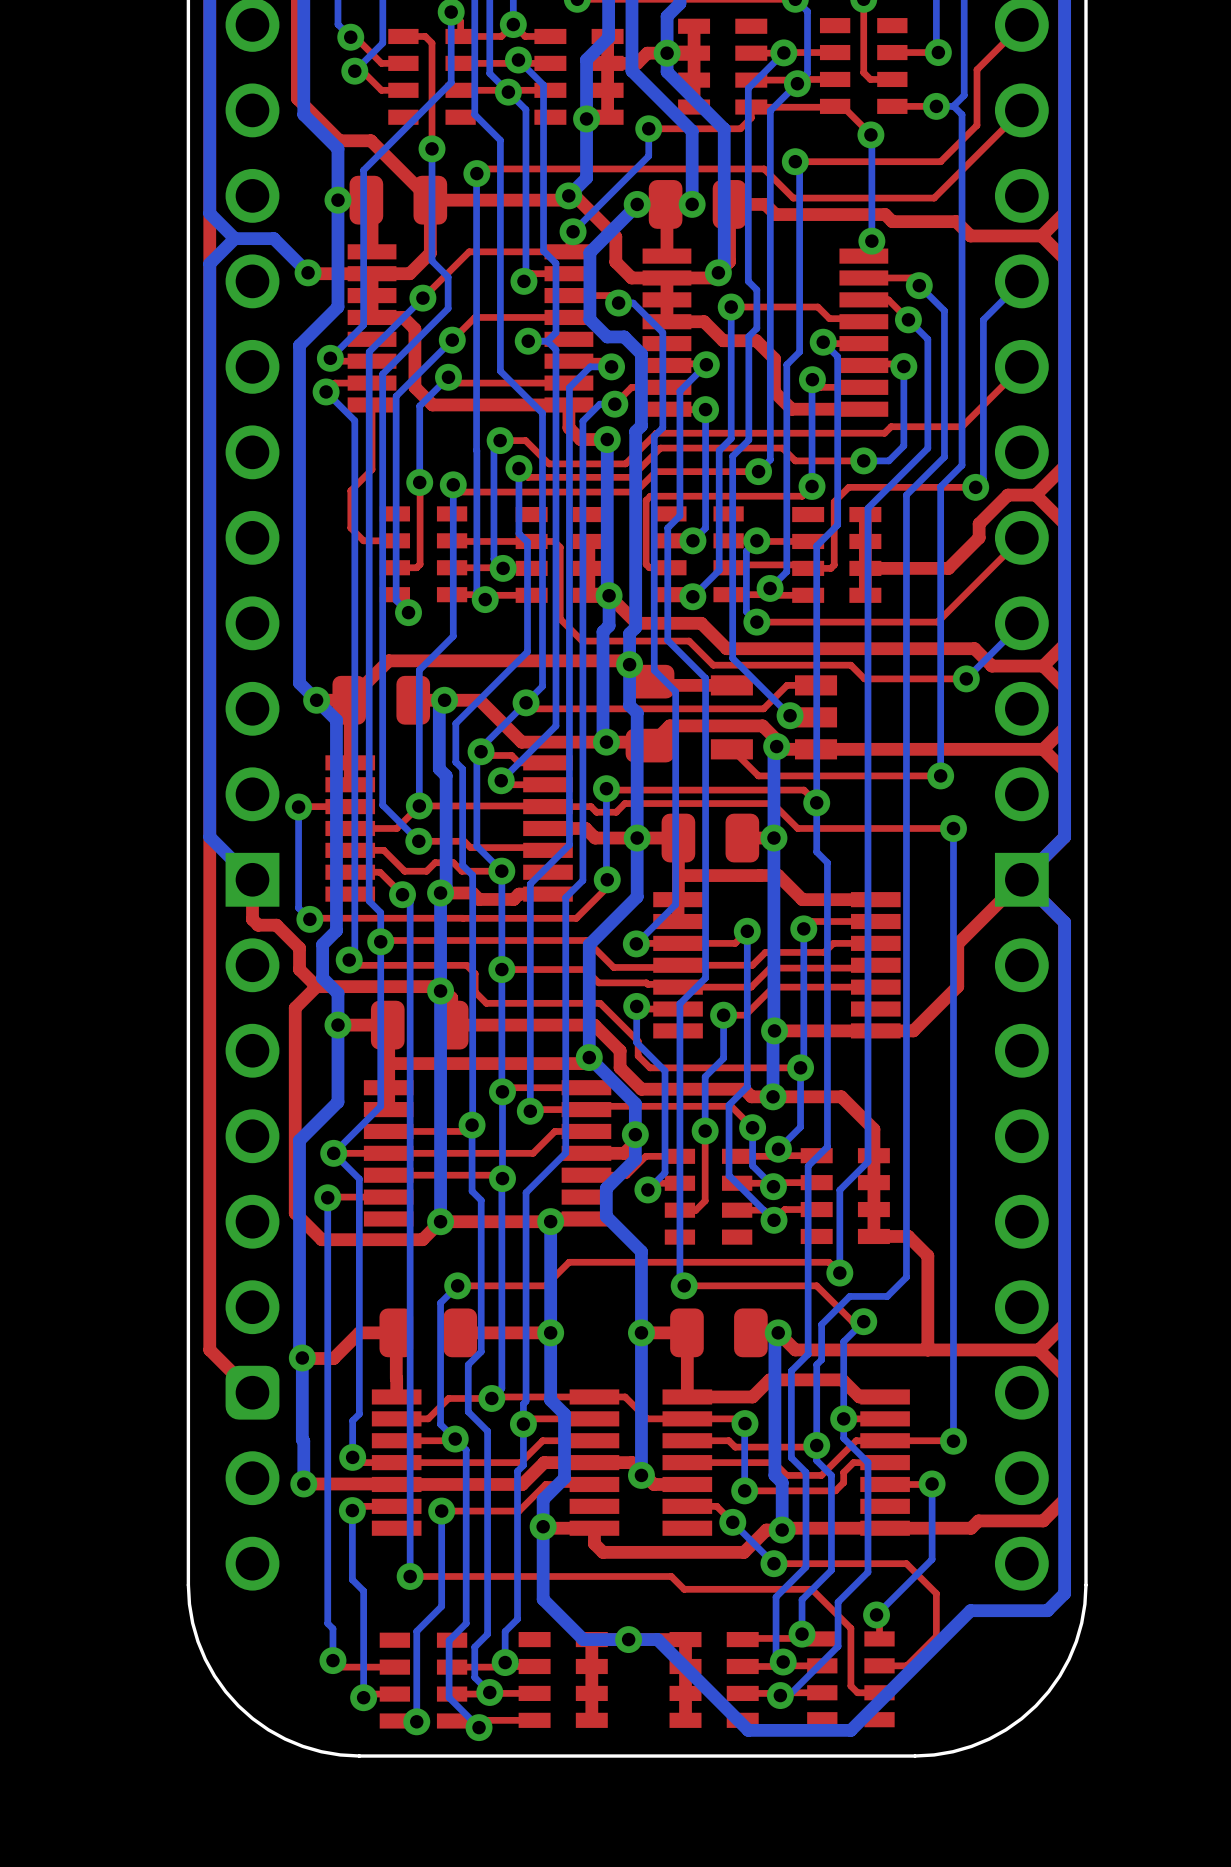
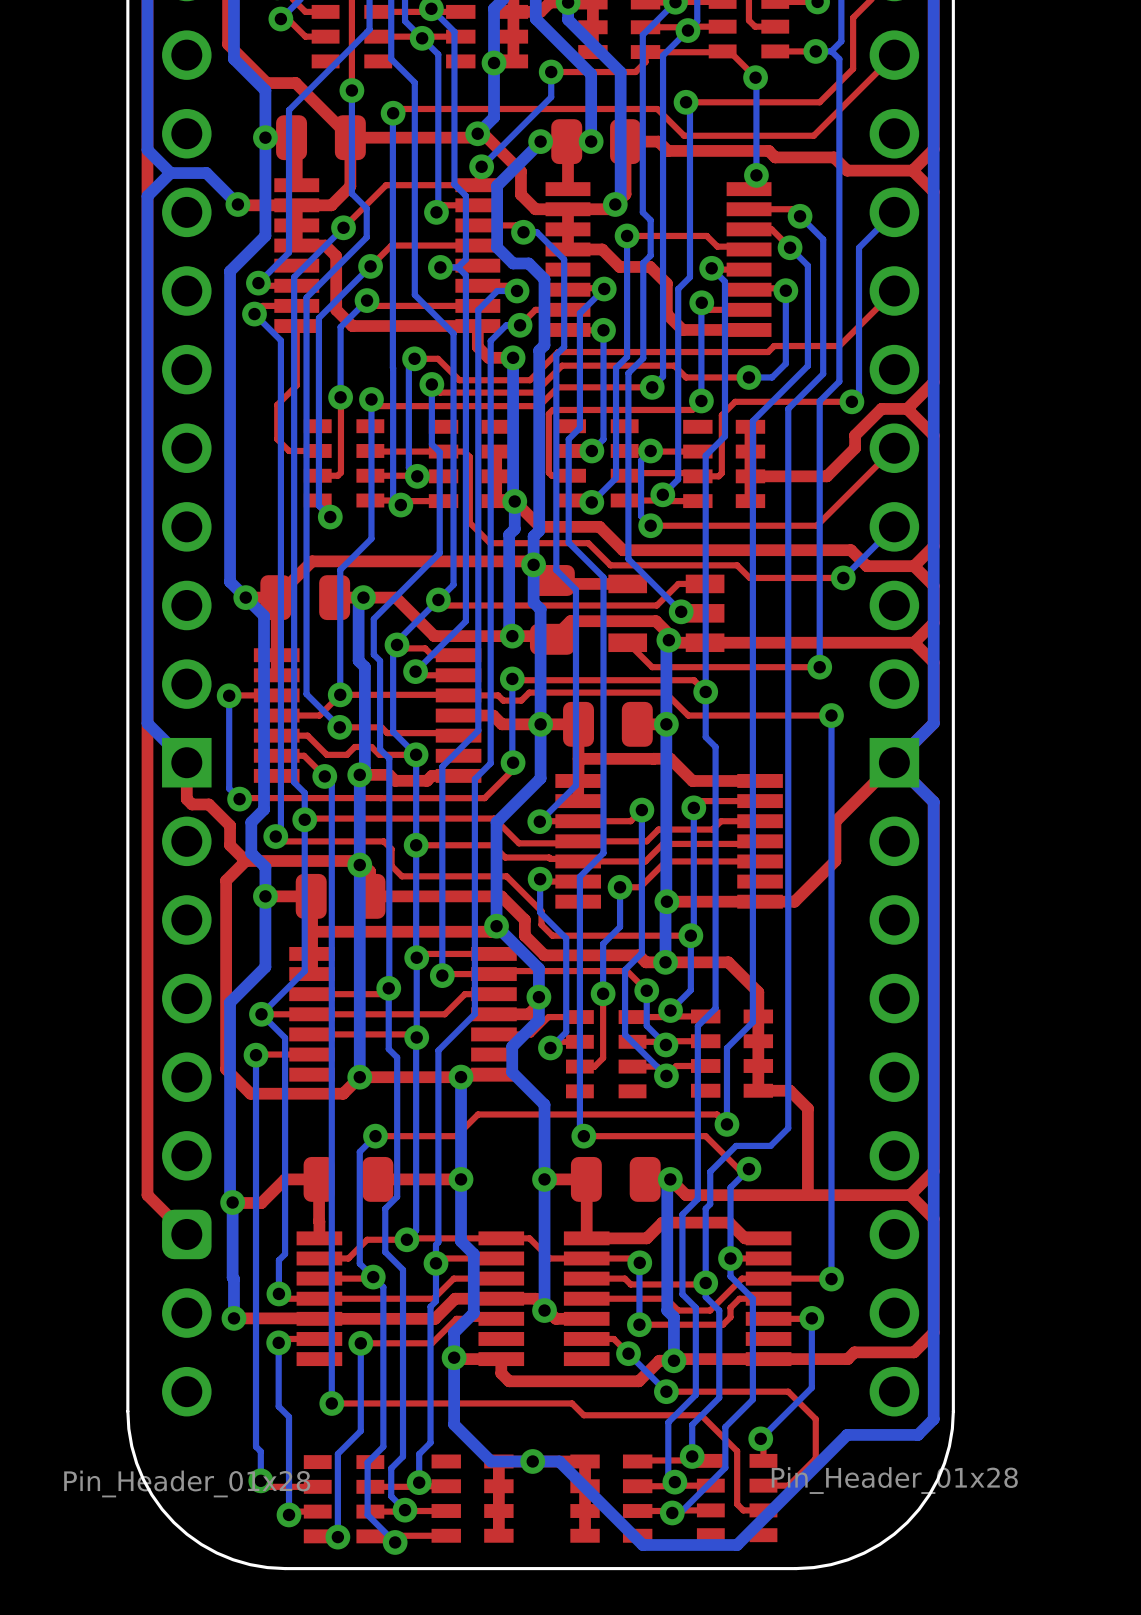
drawing: none -> [771, 1467, 1018, 1494]
drawing: none -> [64, 1470, 311, 1498]

